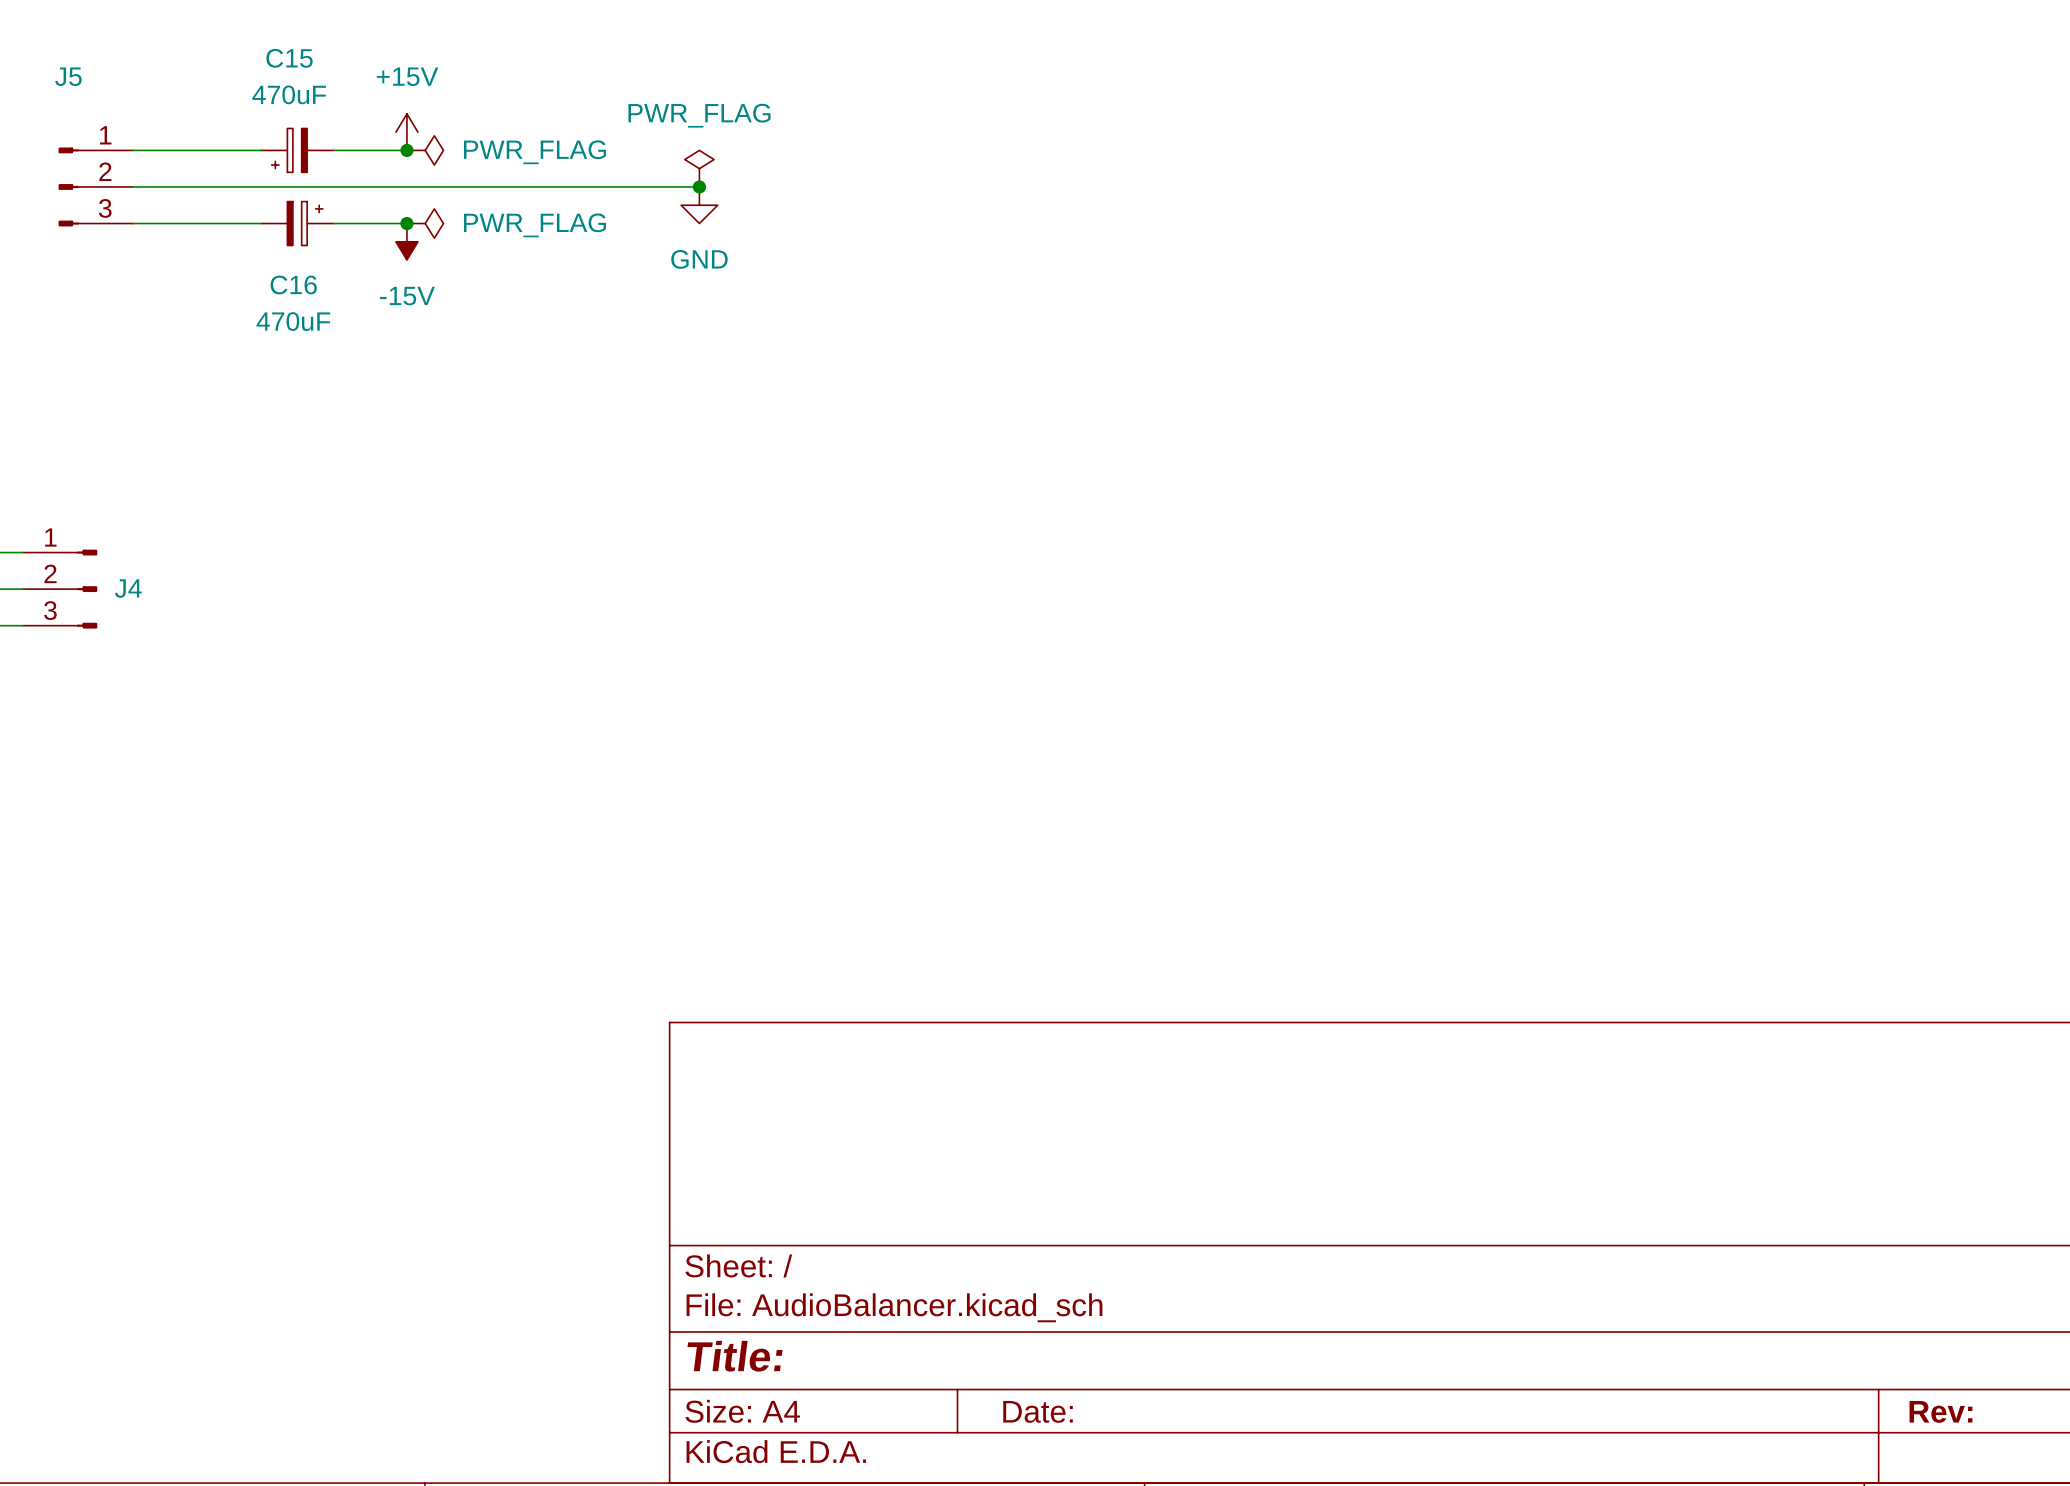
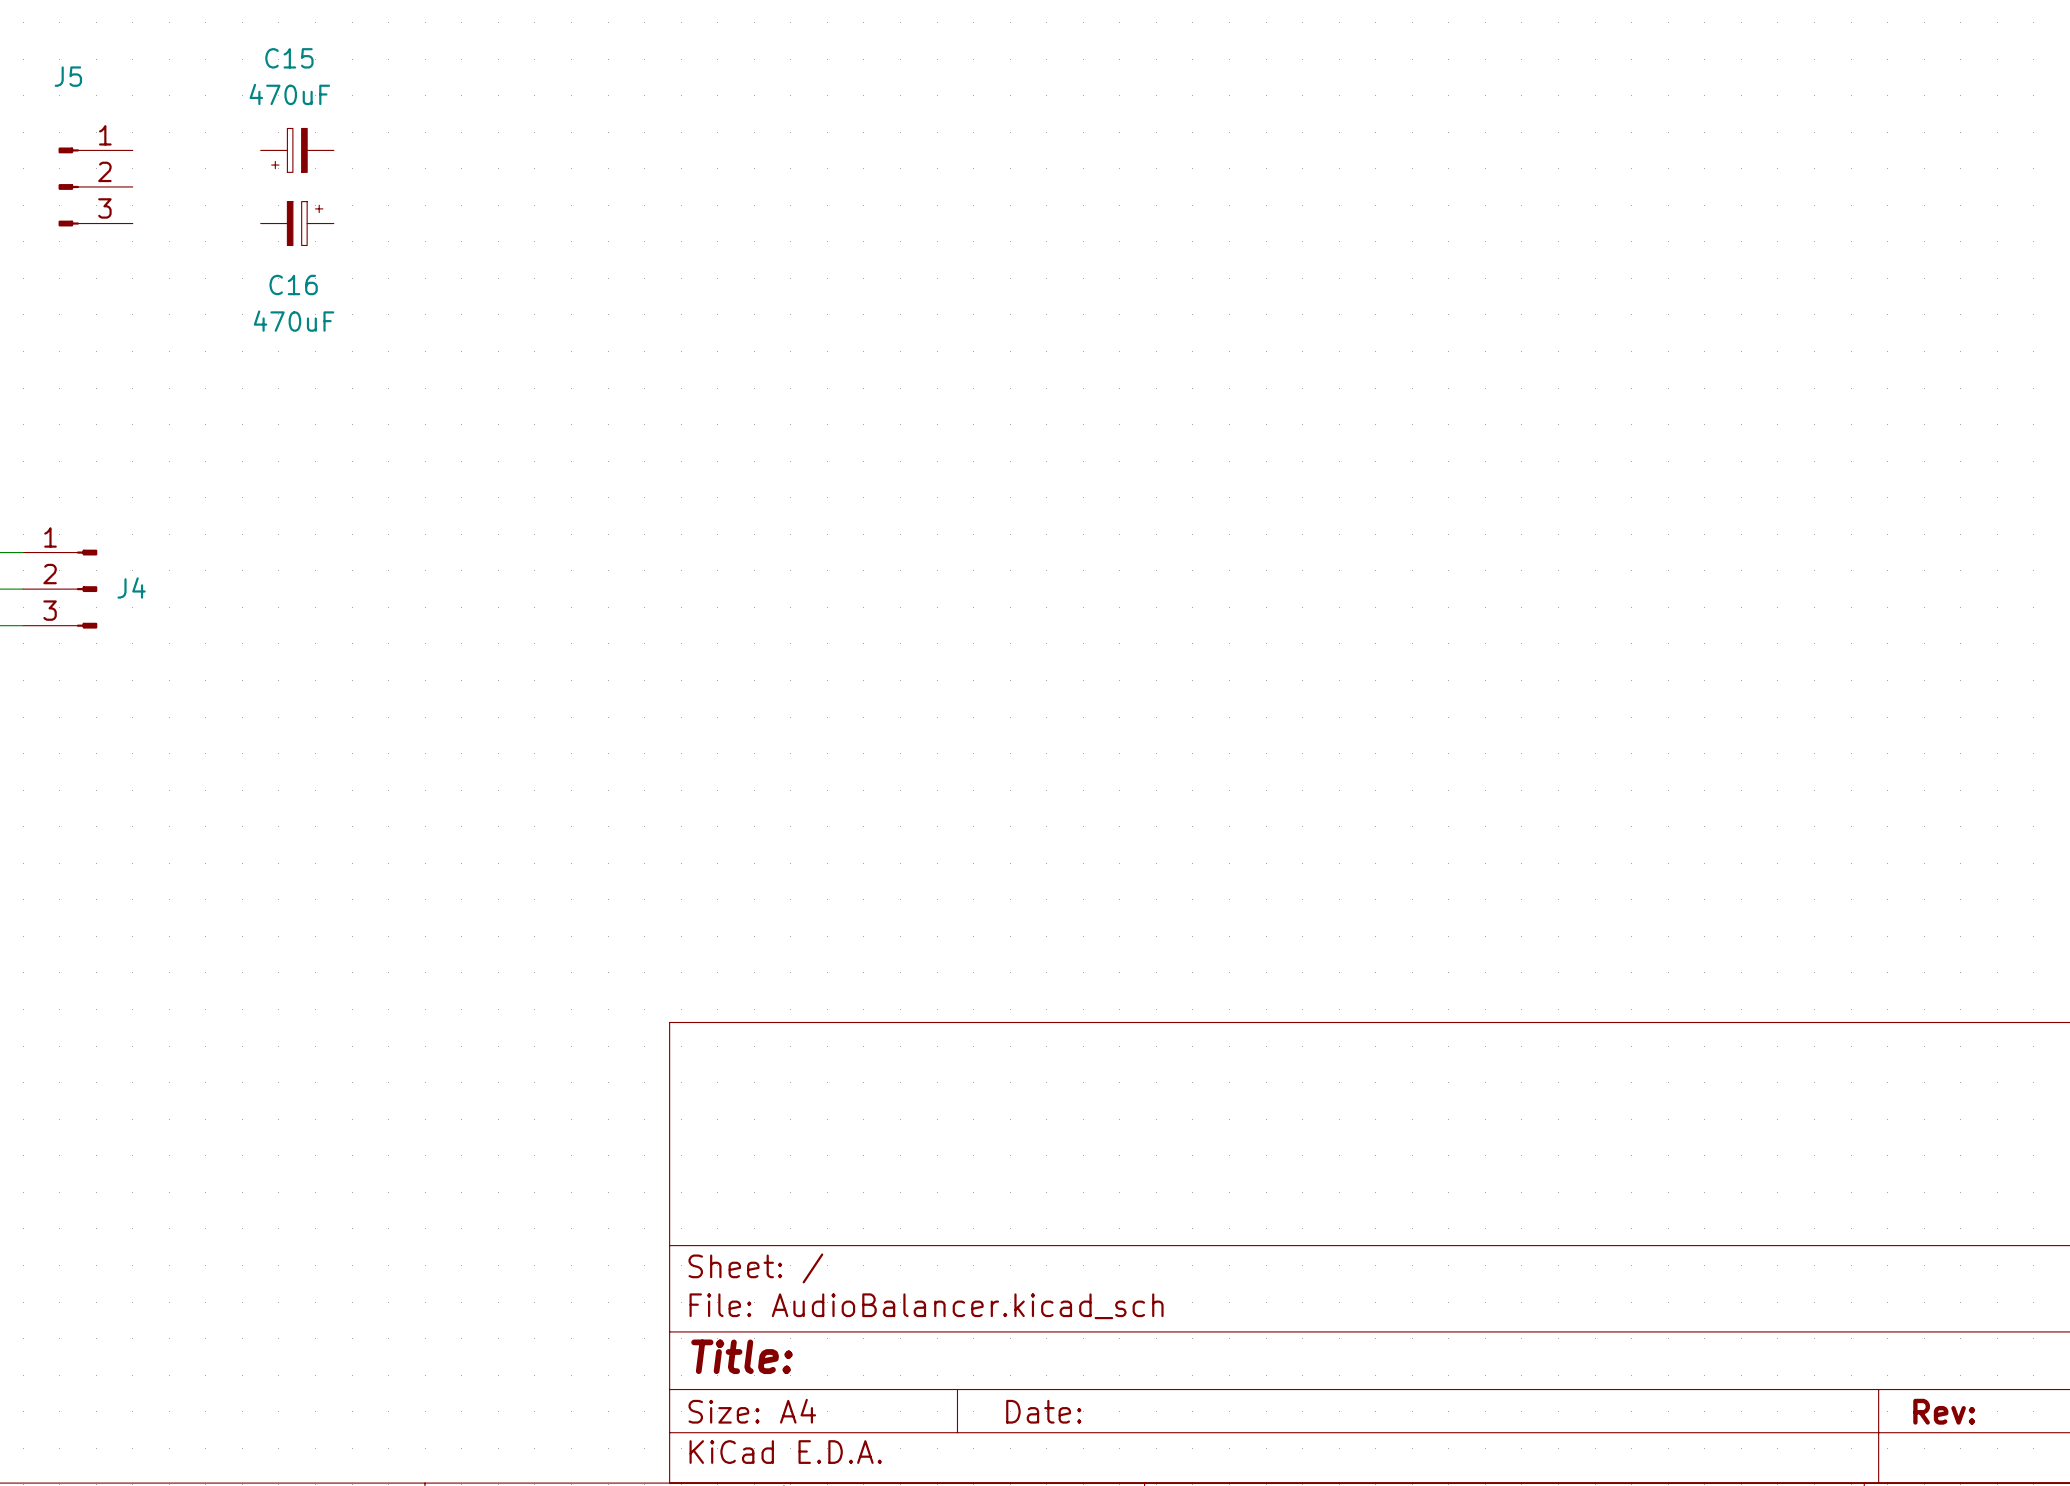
power symbol: +15V (406, 132) -> none
wire: (132, 150) (260, 150) -> none
wire: (333, 150) (406, 150) -> none
junction: (406, 150) -> none
power symbol: PWR_FLAG (425, 150) -> none
power symbol: PWR_FLAG (699, 168) -> none
wire: (132, 186) (699, 186) -> none
junction: (699, 186) -> none
power symbol: GND (699, 205) -> none
wire: (132, 223) (260, 223) -> none
wire: (333, 223) (406, 223) -> none
junction: (406, 223) -> none
power symbol: PWR_FLAG (425, 223) -> none
power symbol: -15V (406, 241) -> none

